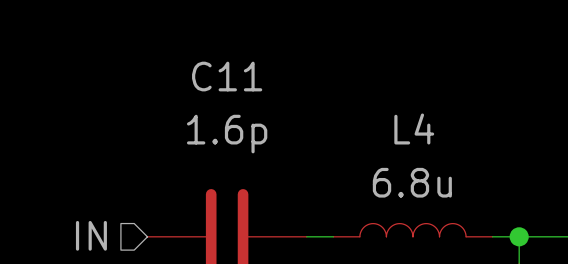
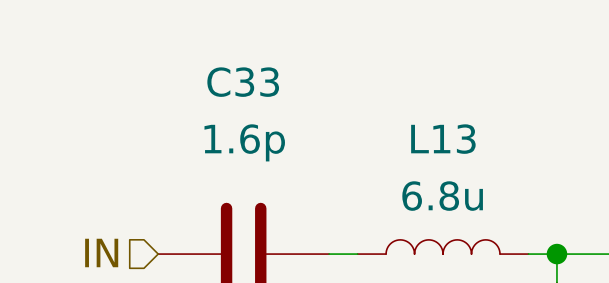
C11 name: C11 (227, 76) -> C33 (243, 82)
L4 name: L4 (414, 129) -> L13 (443, 139)

